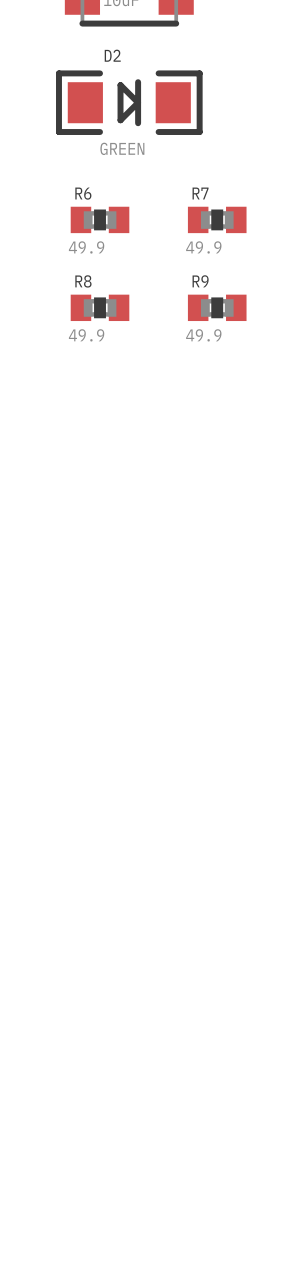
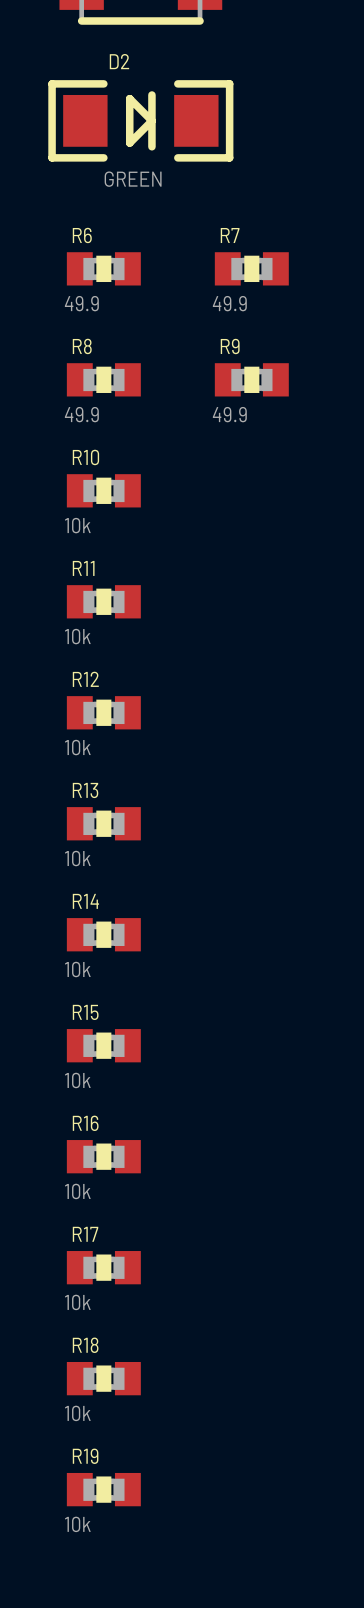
R10: none -> 10k (103, 490)
R11: none -> 10k (103, 601)
R12: none -> 10k (103, 712)
R13: none -> 10k (103, 823)
R14: none -> 10k (103, 934)
R15: none -> 10k (103, 1045)
R16: none -> 10k (103, 1156)
R17: none -> 10k (103, 1267)
R18: none -> 10k (103, 1378)
R19: none -> 10k (103, 1489)

